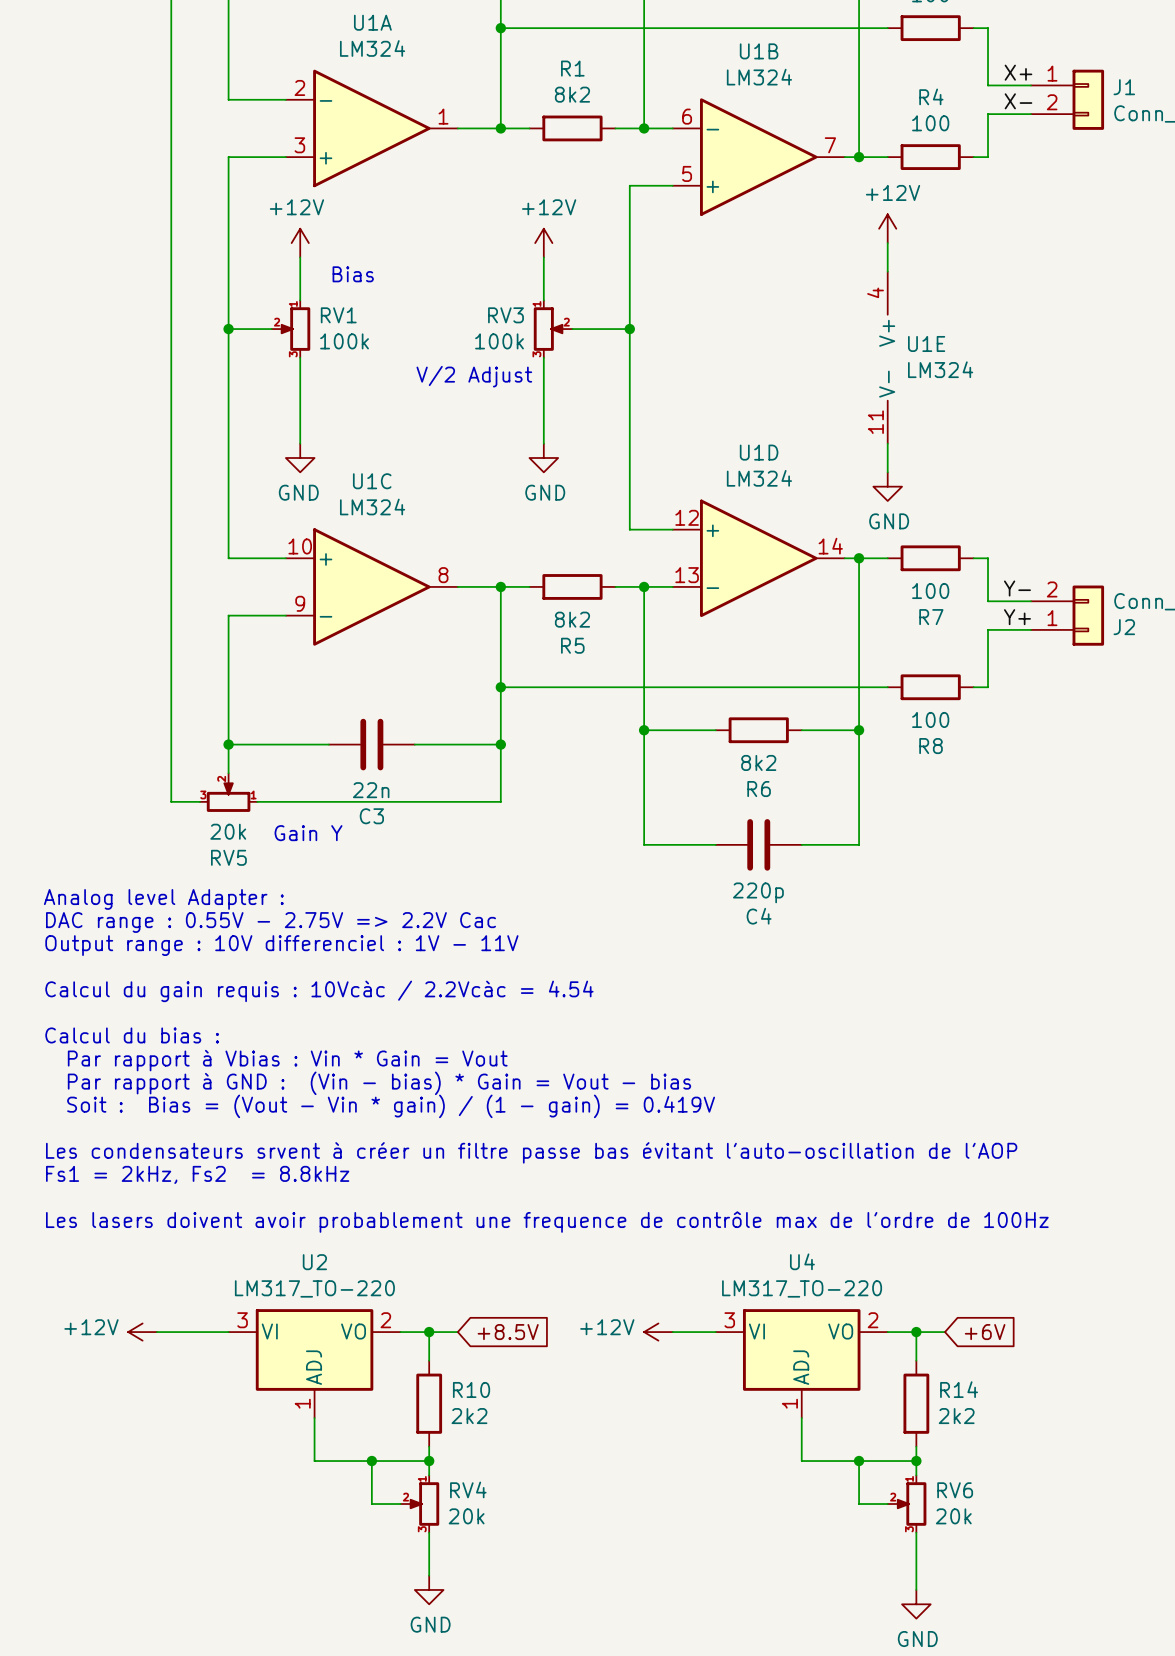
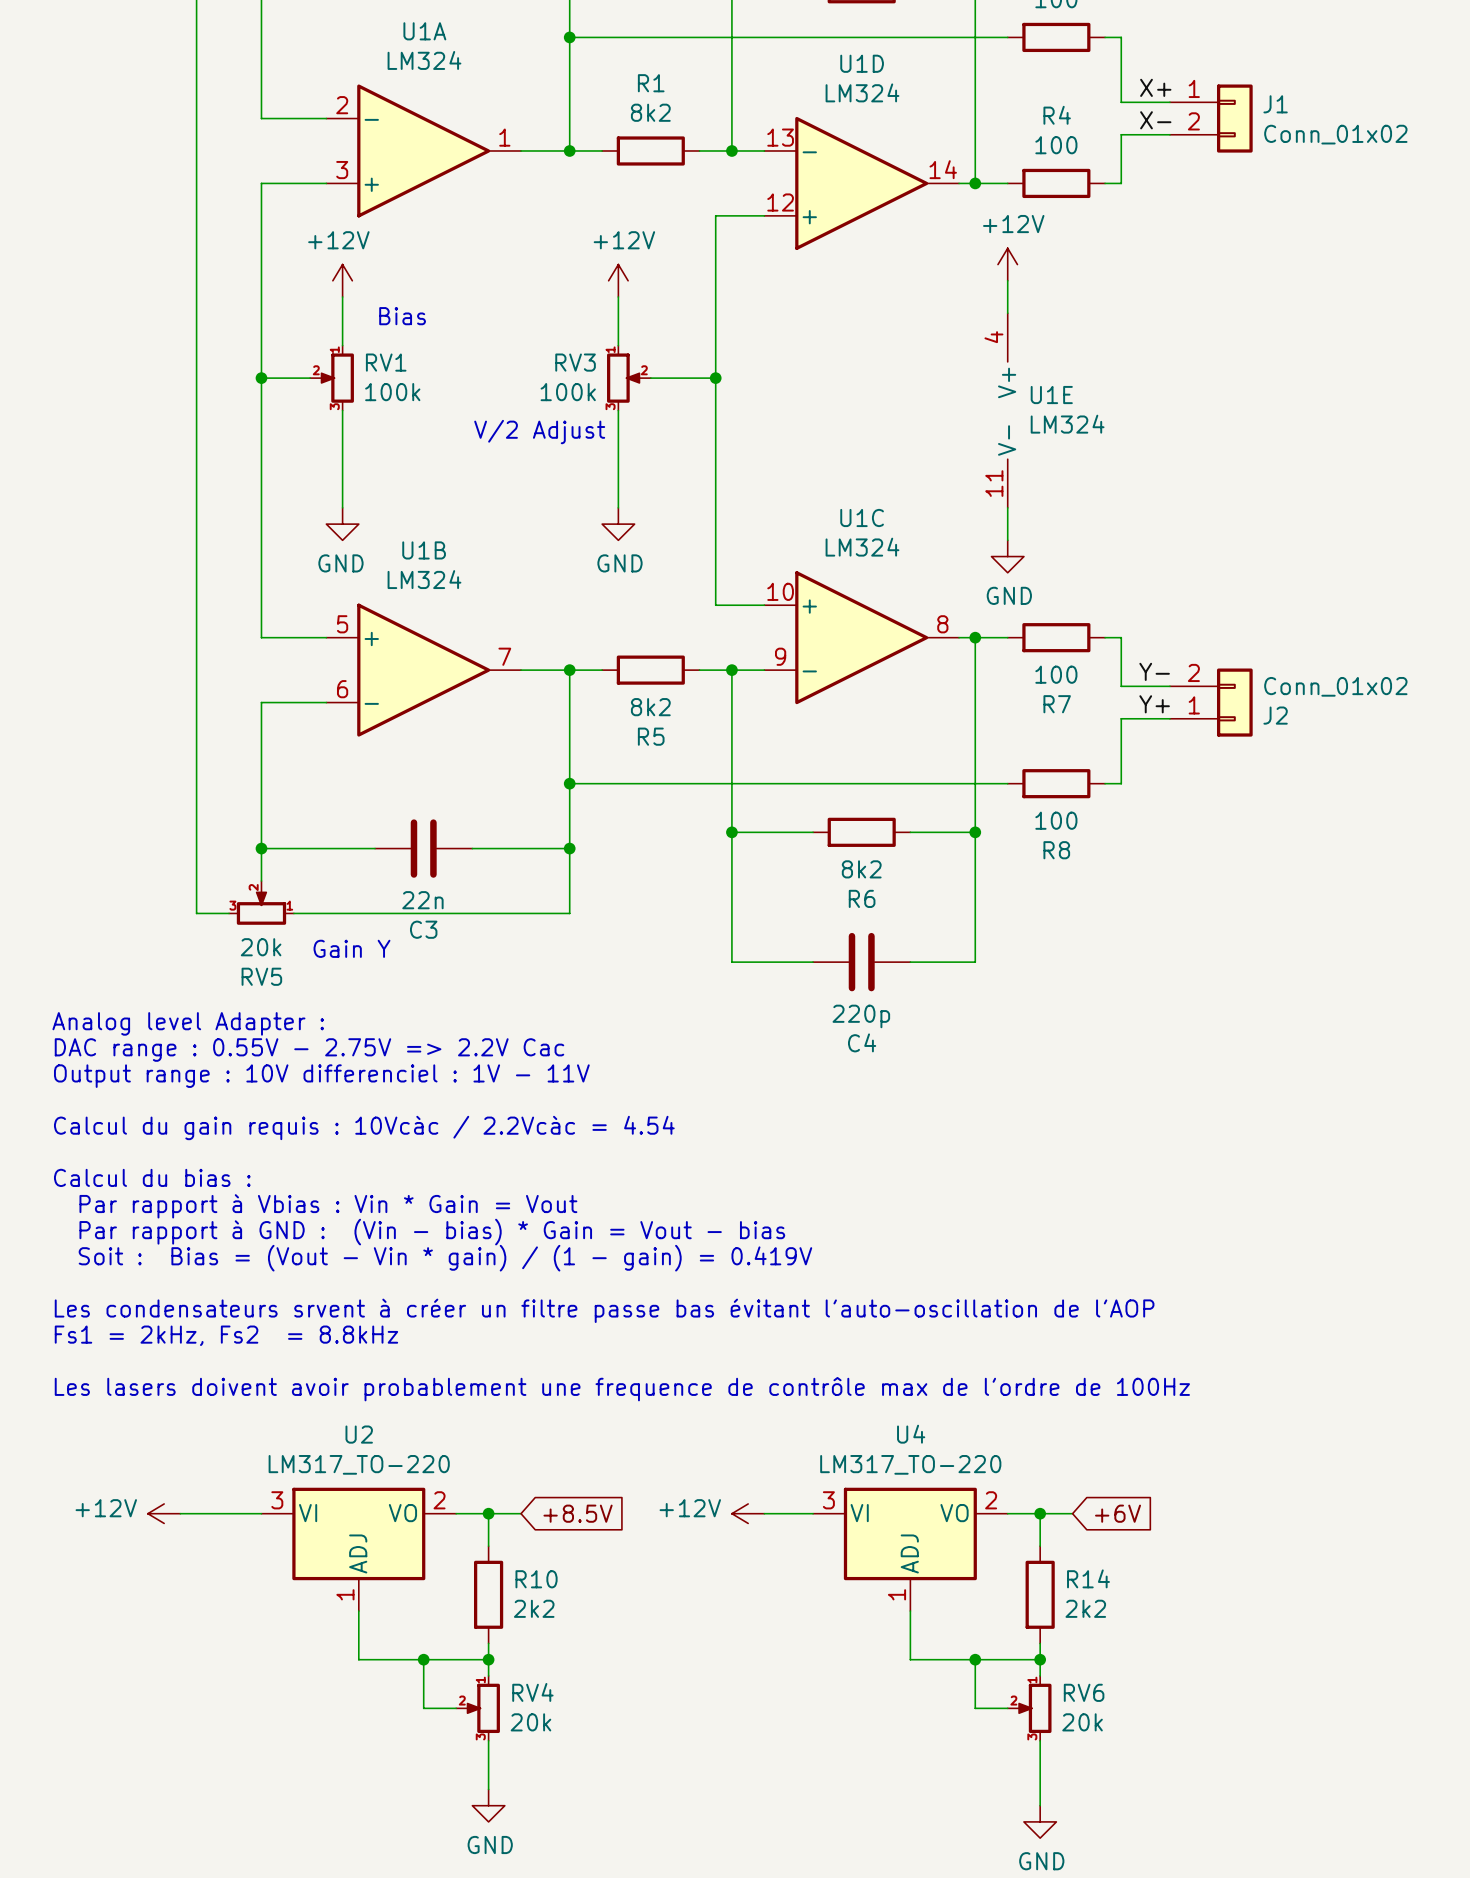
U1B flip: as is (758, 157) -> up-down (423, 670)
U1B position: (758, 157) -> (423, 670)
U1D flip: as is (758, 558) -> up-down (861, 183)
U1D position: (758, 558) -> (861, 183)
U1C position: (371, 586) -> (861, 637)

